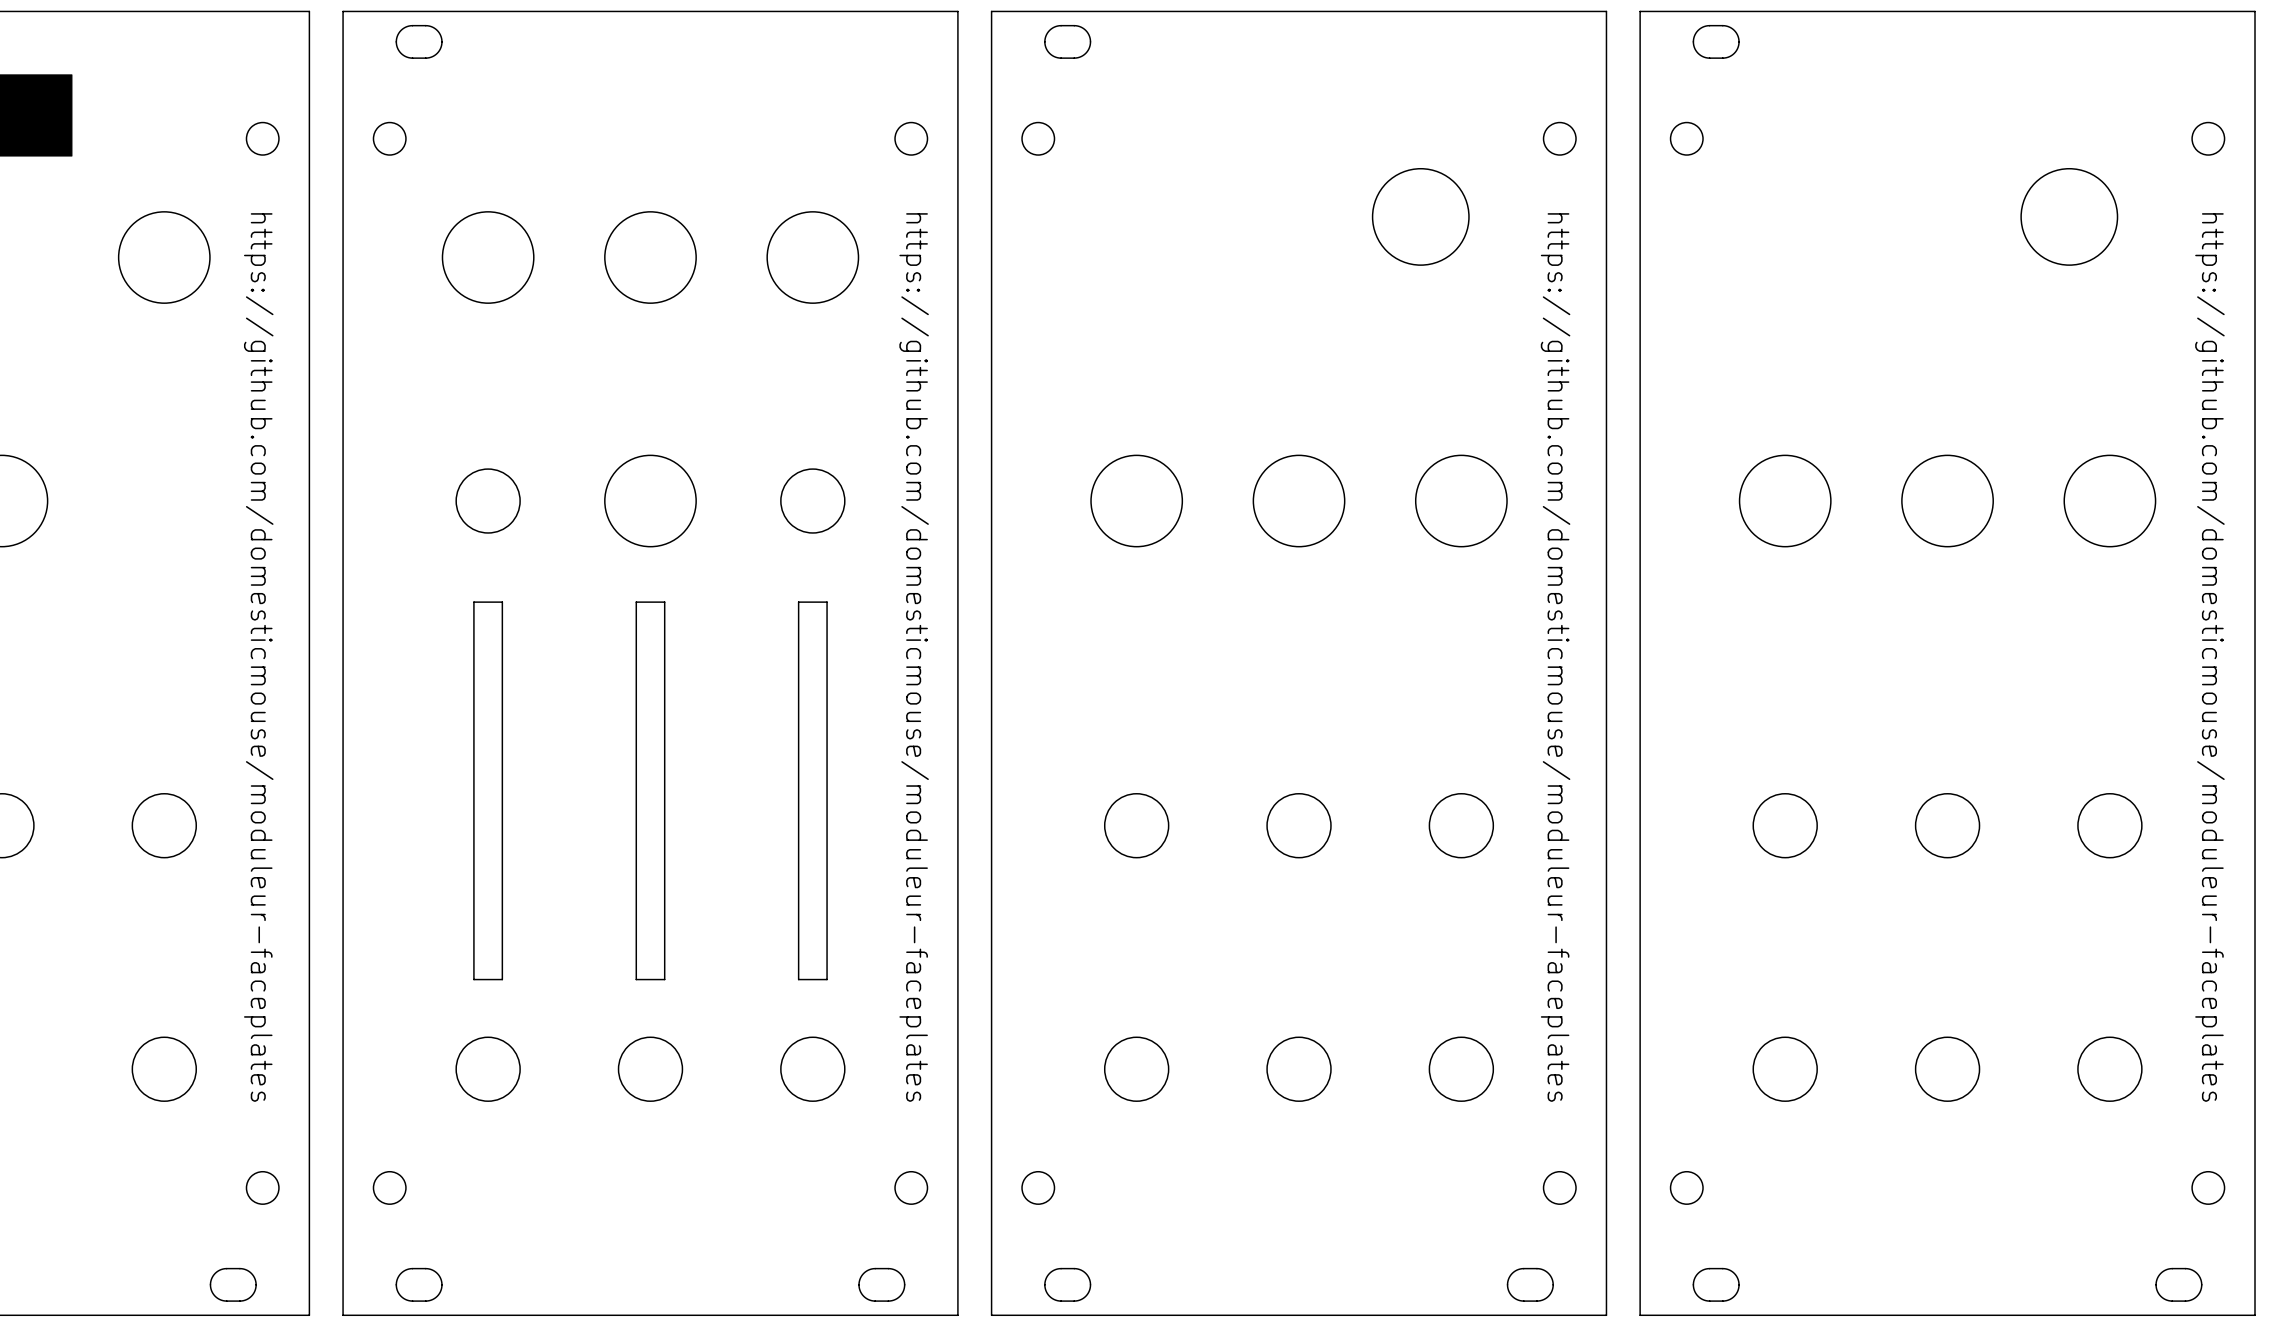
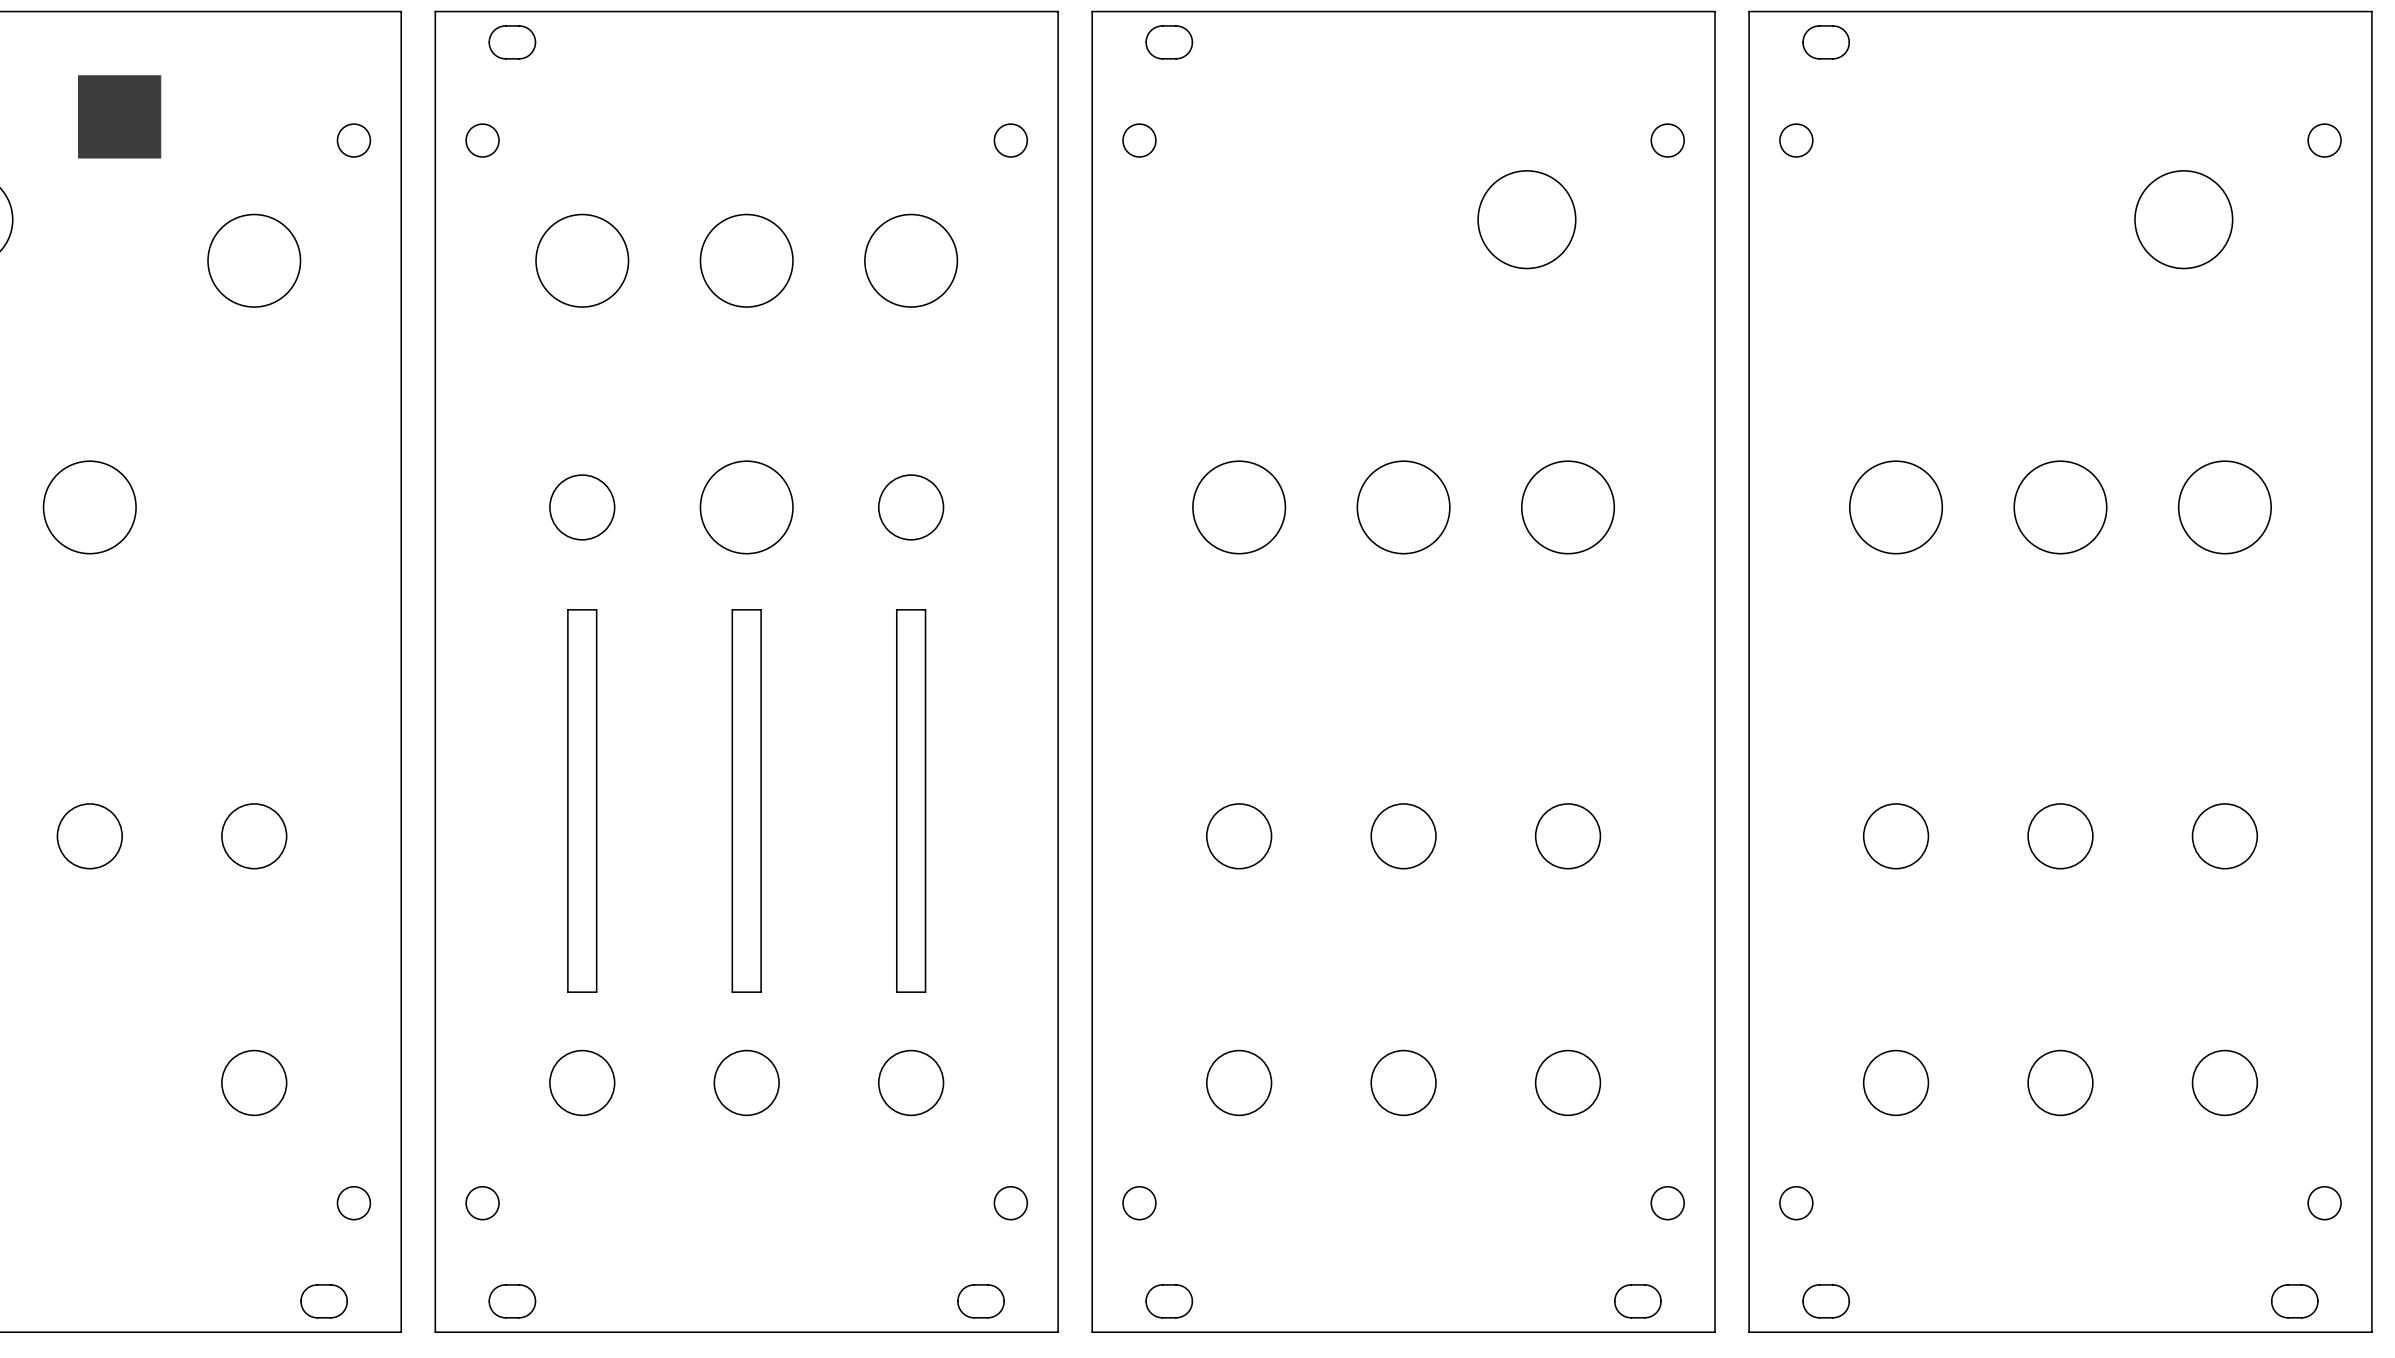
text: https://github.com/domesticmouse/moduleur-faceplates (258, 657) -> none
text: https://github.com/domesticmouse/moduleur-faceplates (914, 657) -> none
text: https://github.com/domesticmouse/moduleur-faceplates (1555, 657) -> none
text: https://github.com/domesticmouse/moduleur-faceplates (2209, 657) -> none

